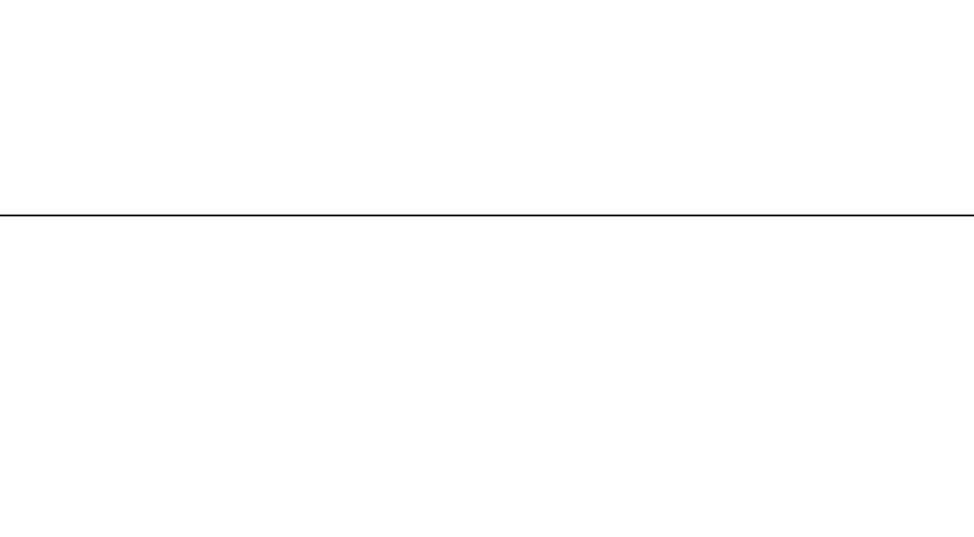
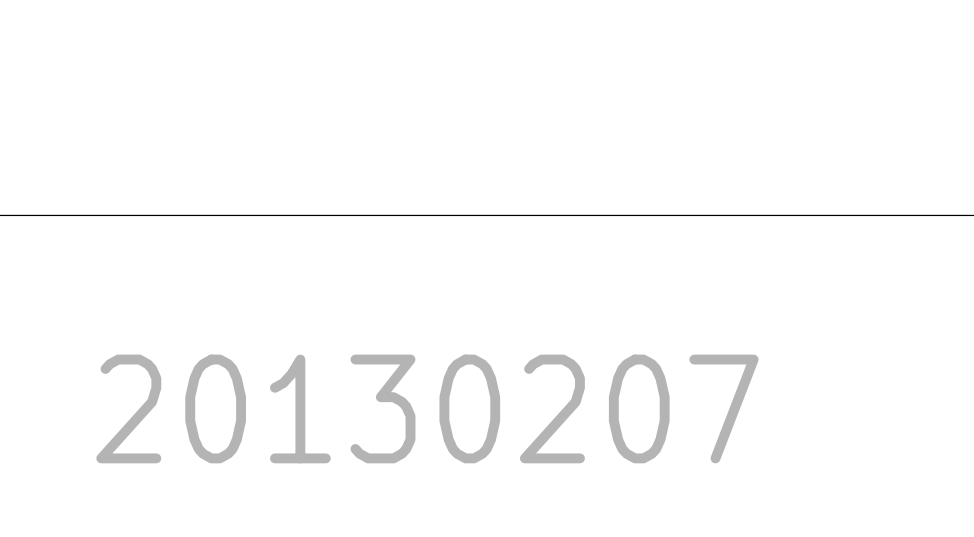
text: none -> 20130207 (427, 408)

